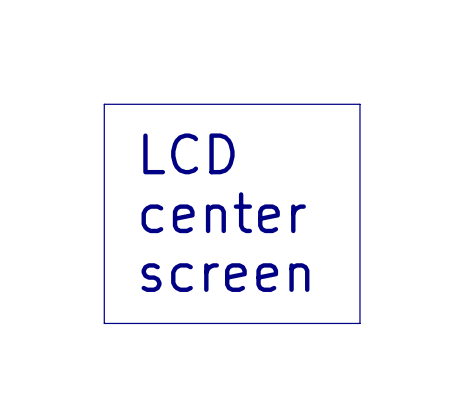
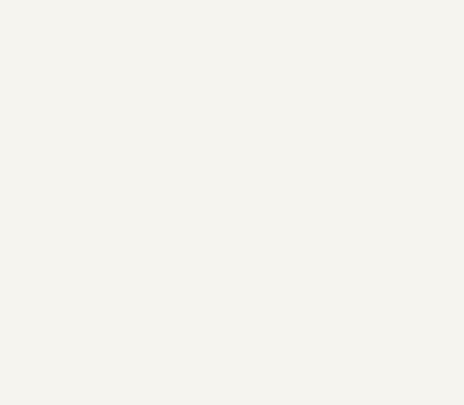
line: (104, 104) (359, 104) (359, 323) (104, 323) (104, 104) -> none
text: LCD (188, 153) -> none
text: center (223, 212) -> none
text: screen (225, 277) -> none

